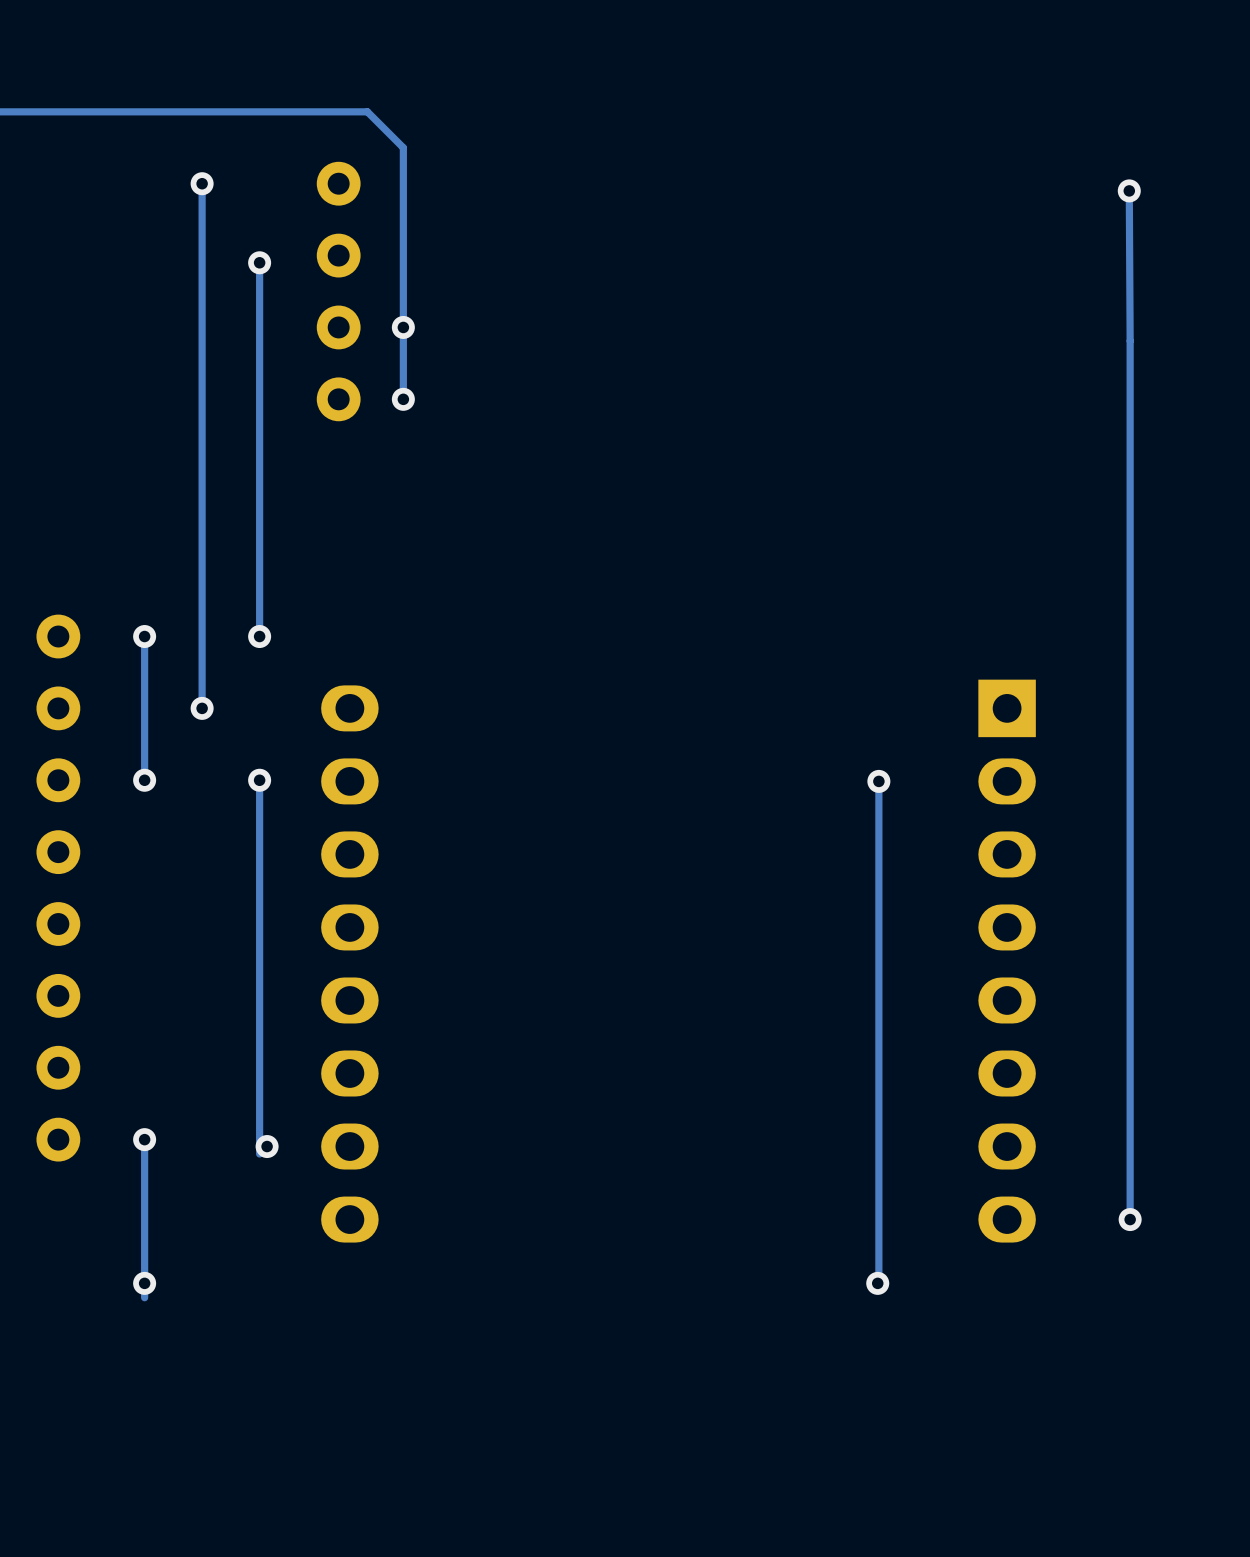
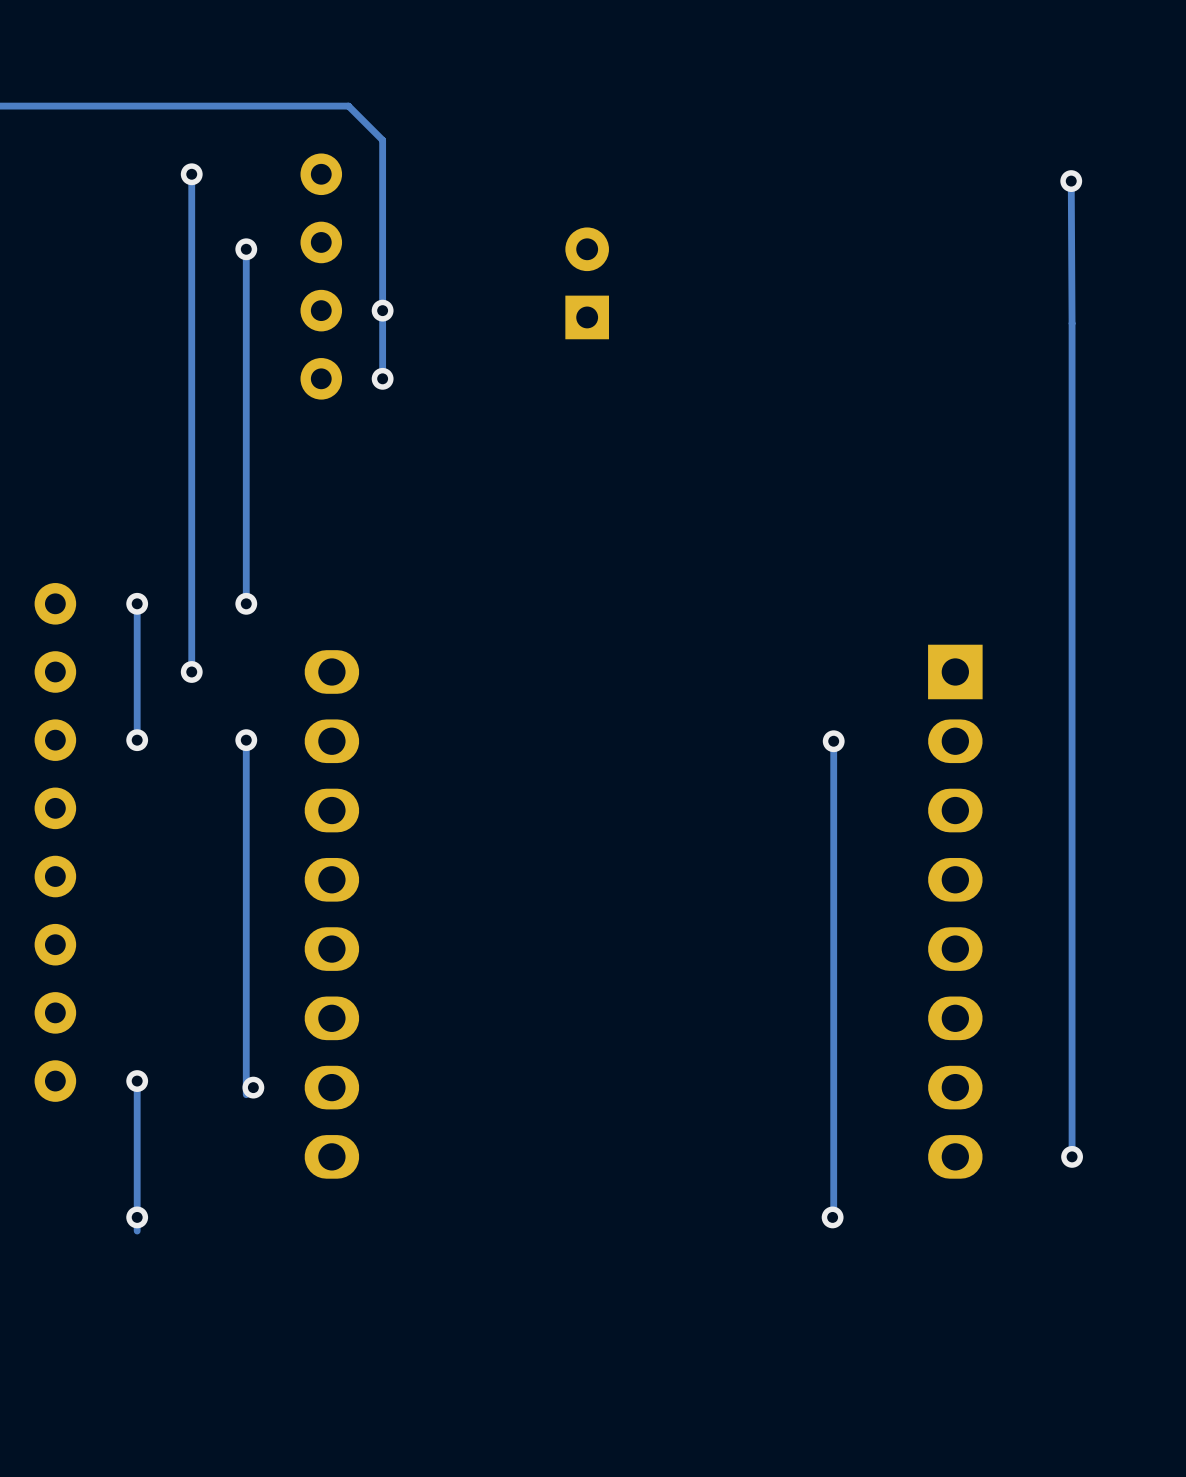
part: none -> (587, 283)

